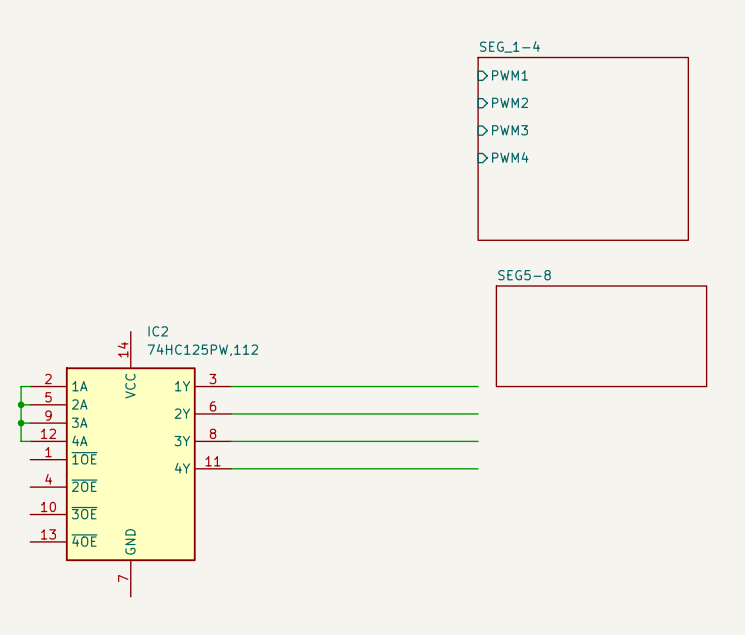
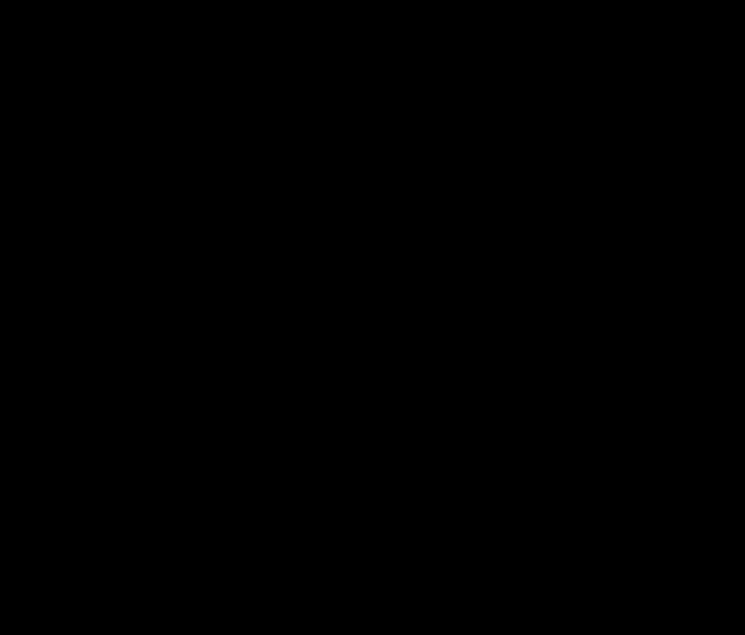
sheet pin: PWM1 (510, 75) -> none
sheet pin: PWM2 (510, 102) -> none
sheet pin: PWM3 (510, 130) -> none
sheet SEG_1-4: (583, 148) -> none
sheet pin: PWM4 (510, 157) -> none
sheet SEG5-8: (601, 336) -> none
wire: (30, 386) (21, 386) (21, 441) (30, 441) -> none
wire: (231, 386) (478, 386) -> none
wire: (21, 404) (30, 404) -> none
junction: (21, 404) -> none
wire: (231, 413) (478, 413) -> none
wire: (21, 423) (30, 423) -> none
junction: (21, 423) -> none
wire: (231, 441) (478, 441) -> none
IC2: 74HC125PW,112 (130, 464) -> none
wire: (231, 468) (478, 468) -> none

